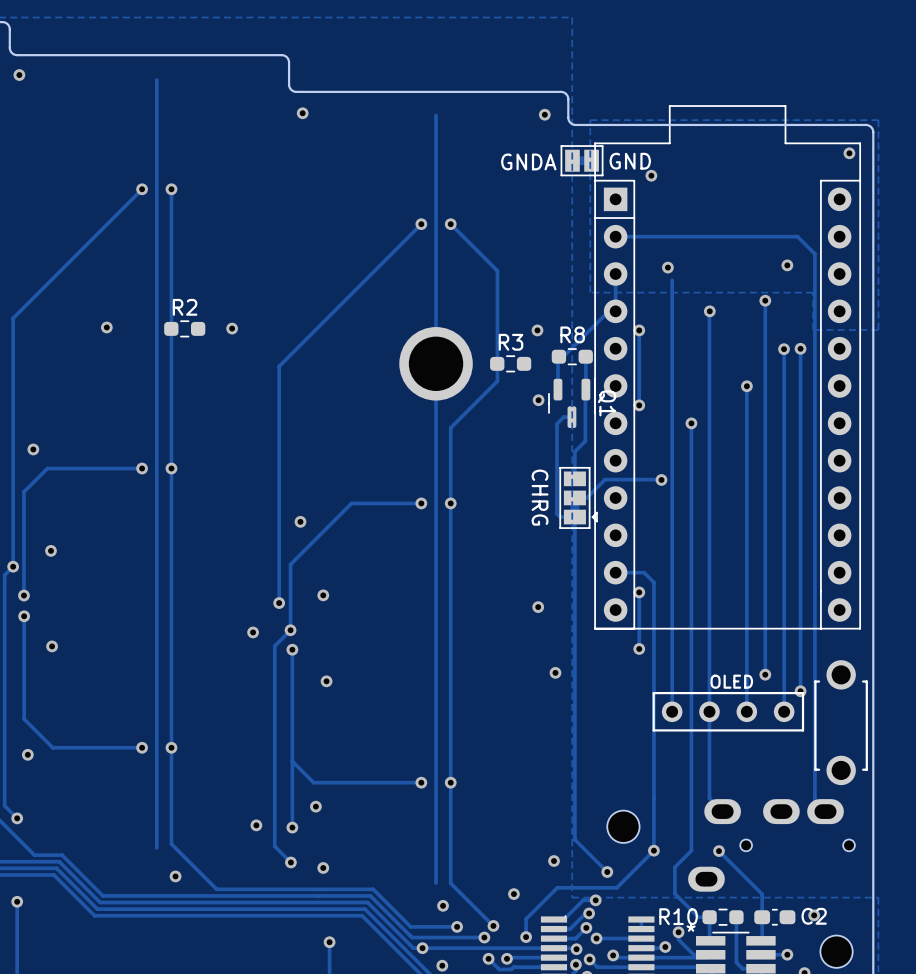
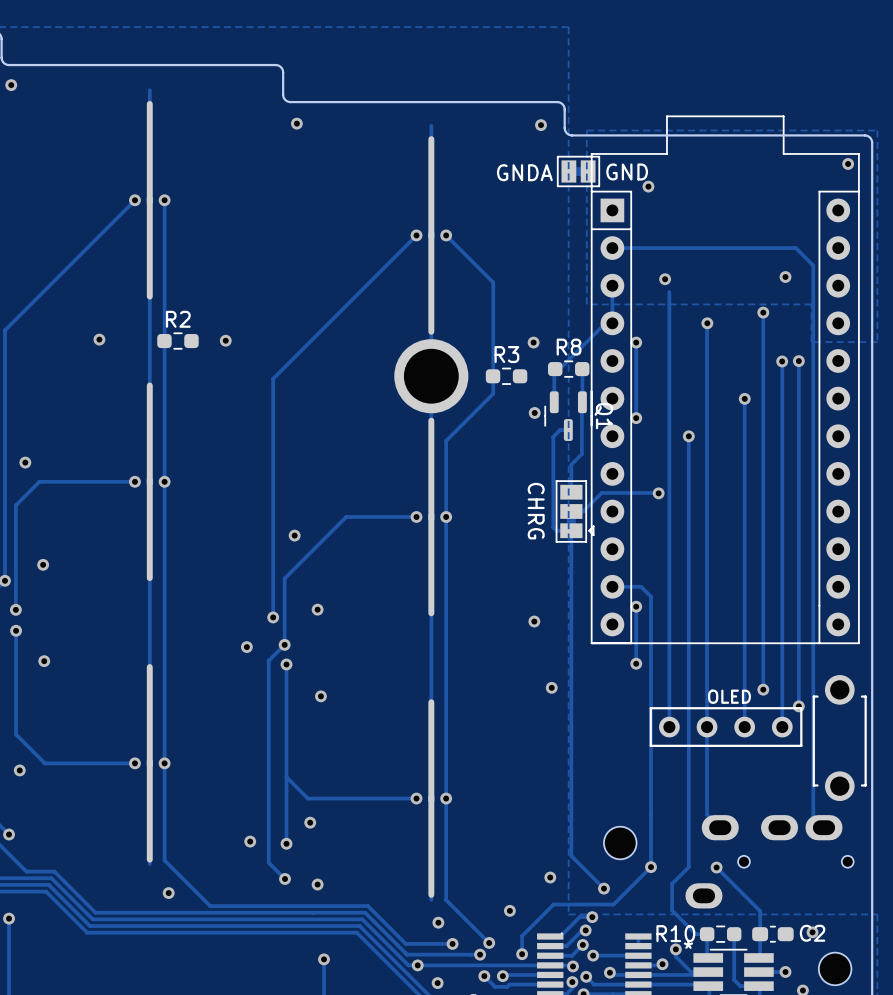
part: none -> (149, 200)
part: none -> (431, 235)
part: none -> (149, 481)
part: none -> (431, 517)
part: none -> (149, 763)
part: none -> (431, 798)

